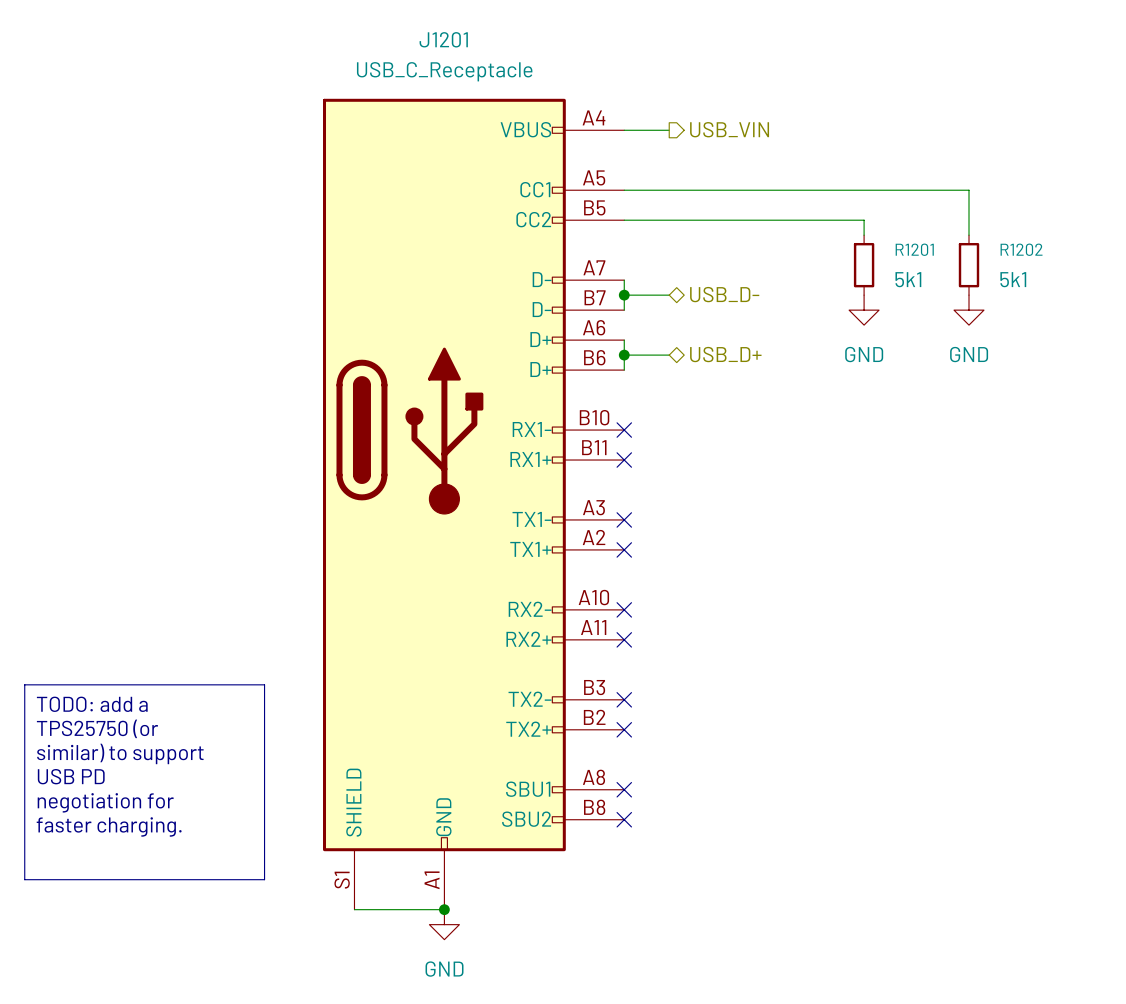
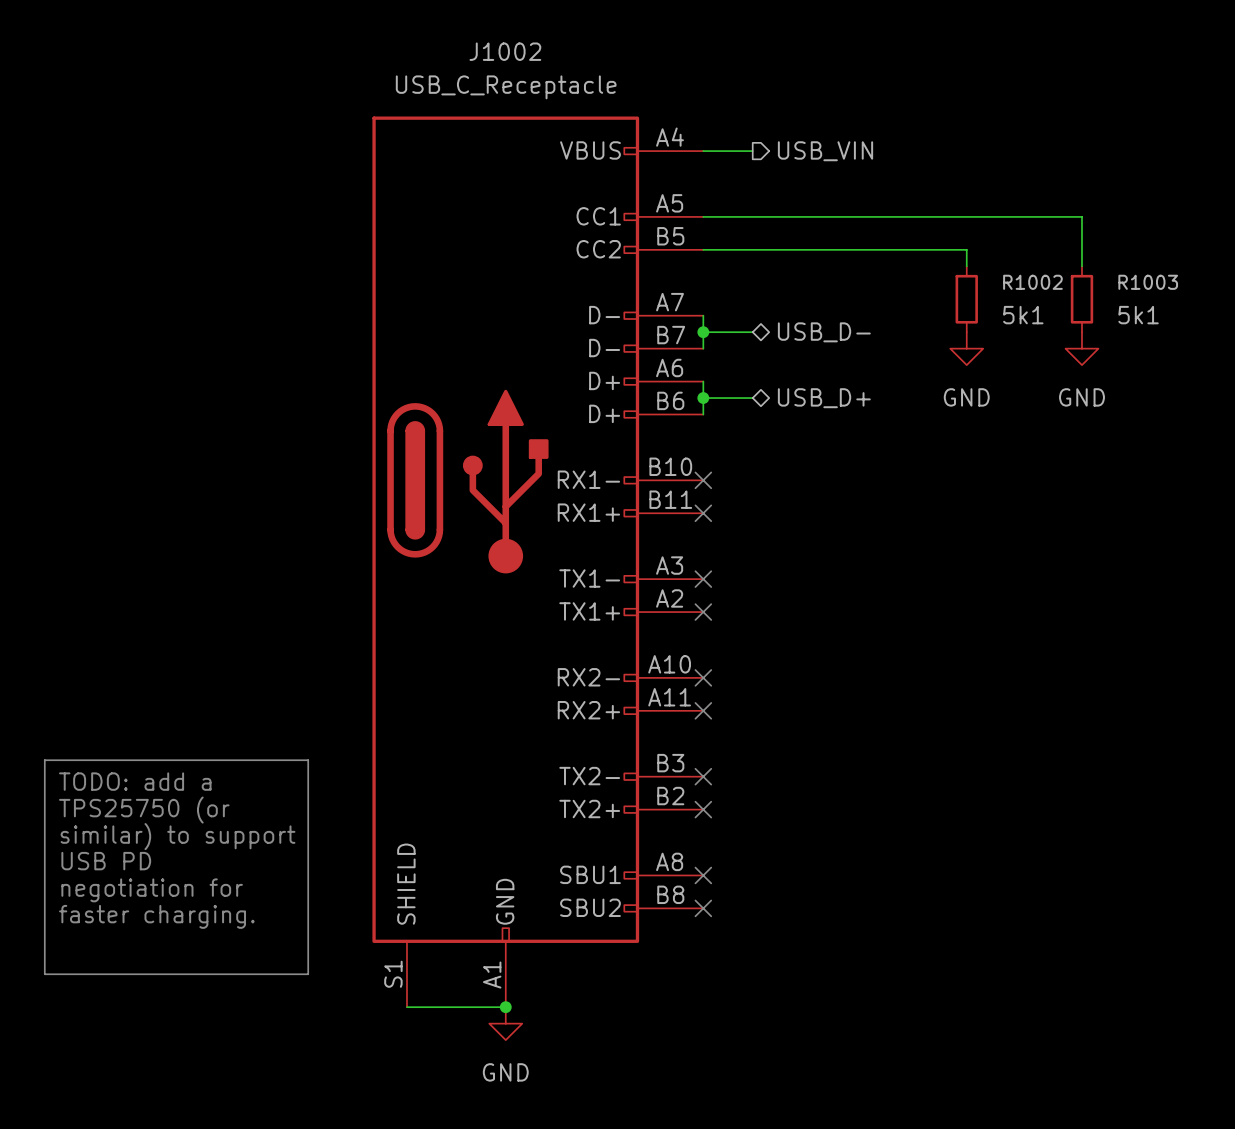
J1201 name: J1201 (443, 39) -> J1002 (505, 51)
R1201 name: R1201 (914, 249) -> R1002 (1032, 282)
R1202 name: R1202 (1021, 249) -> R1003 (1148, 282)

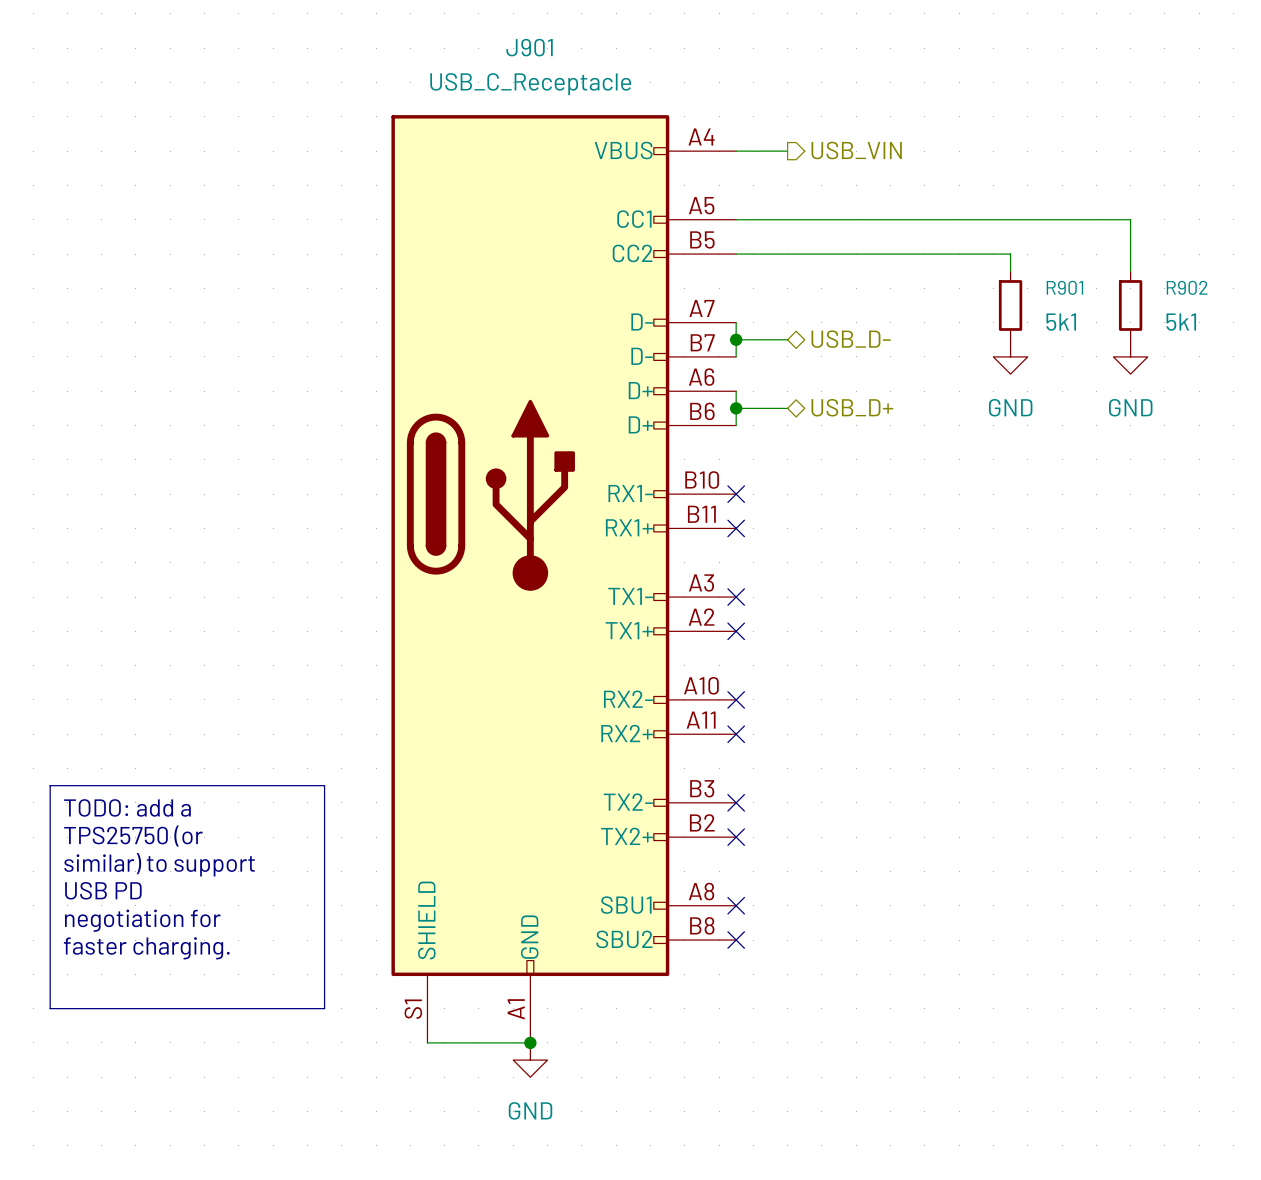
J1002 name: J1002 (505, 51) -> J901 (529, 47)
R1002 name: R1002 (1032, 282) -> R901 (1064, 287)
R1003 name: R1003 (1148, 282) -> R902 (1187, 287)

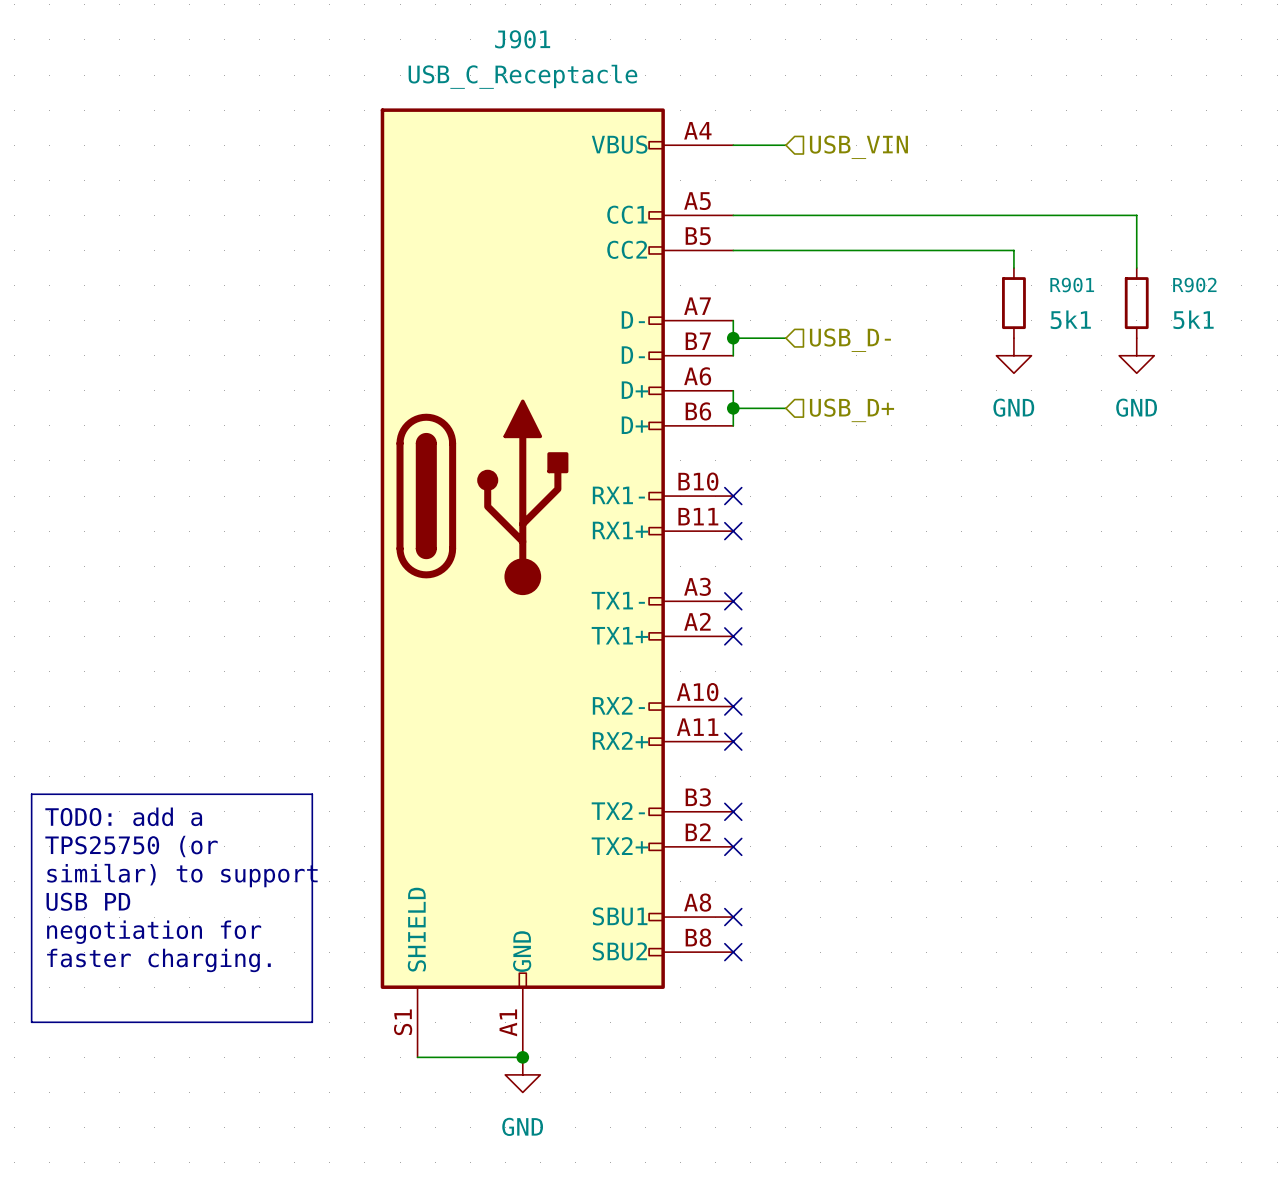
hierarchical label shape: output (856, 150) -> input (858, 147)
hierarchical label shape: bidirectional (851, 339) -> input (850, 340)
hierarchical label shape: bidirectional (852, 407) -> input (851, 410)

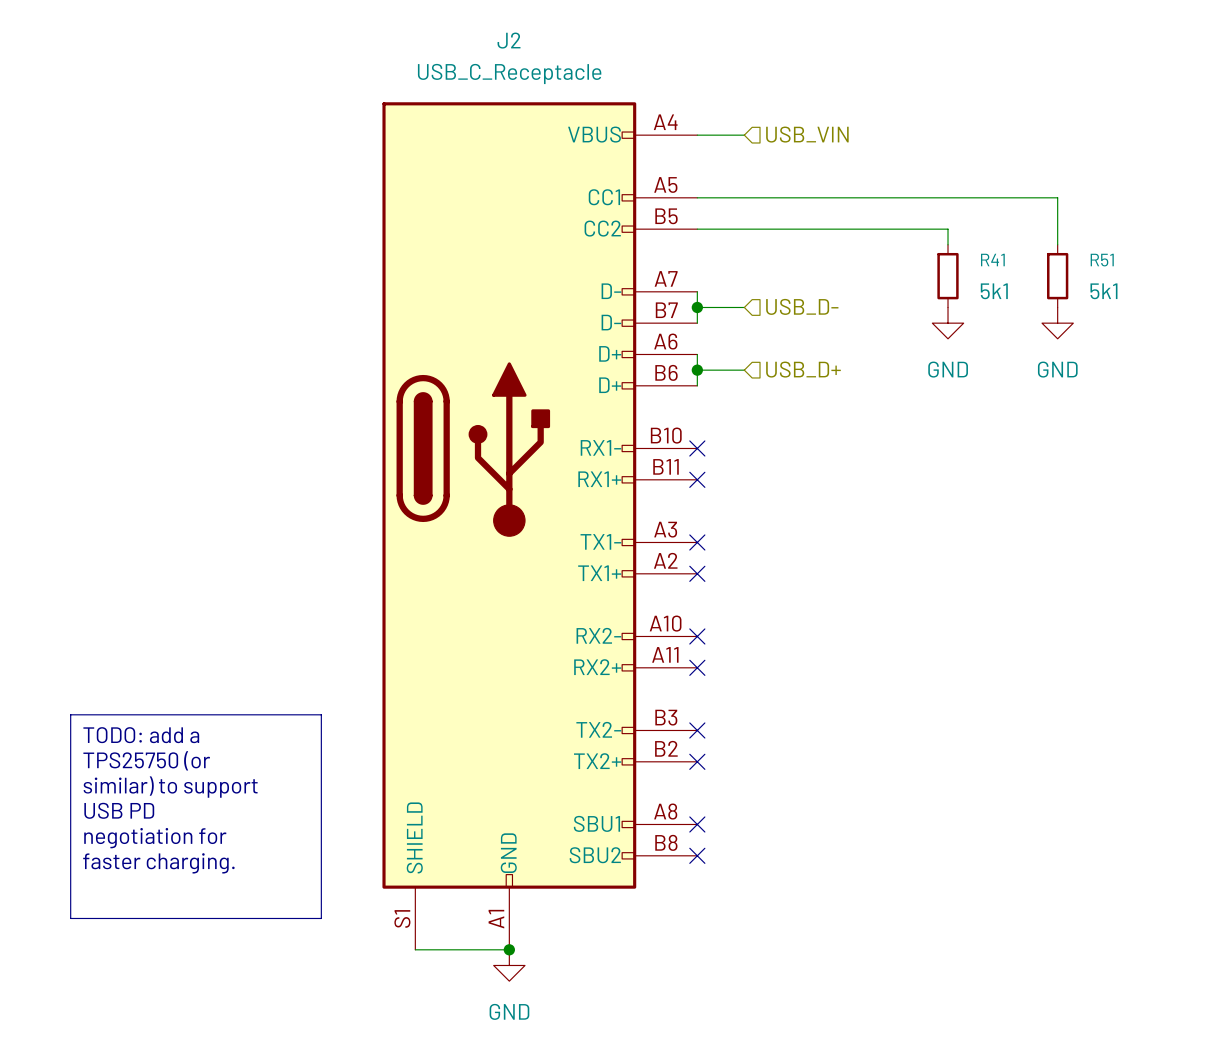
J901 name: J901 (522, 39) -> J2 (509, 40)
R901 name: R901 (1072, 285) -> R41 (992, 260)
R902 name: R902 (1194, 285) -> R51 (1102, 260)

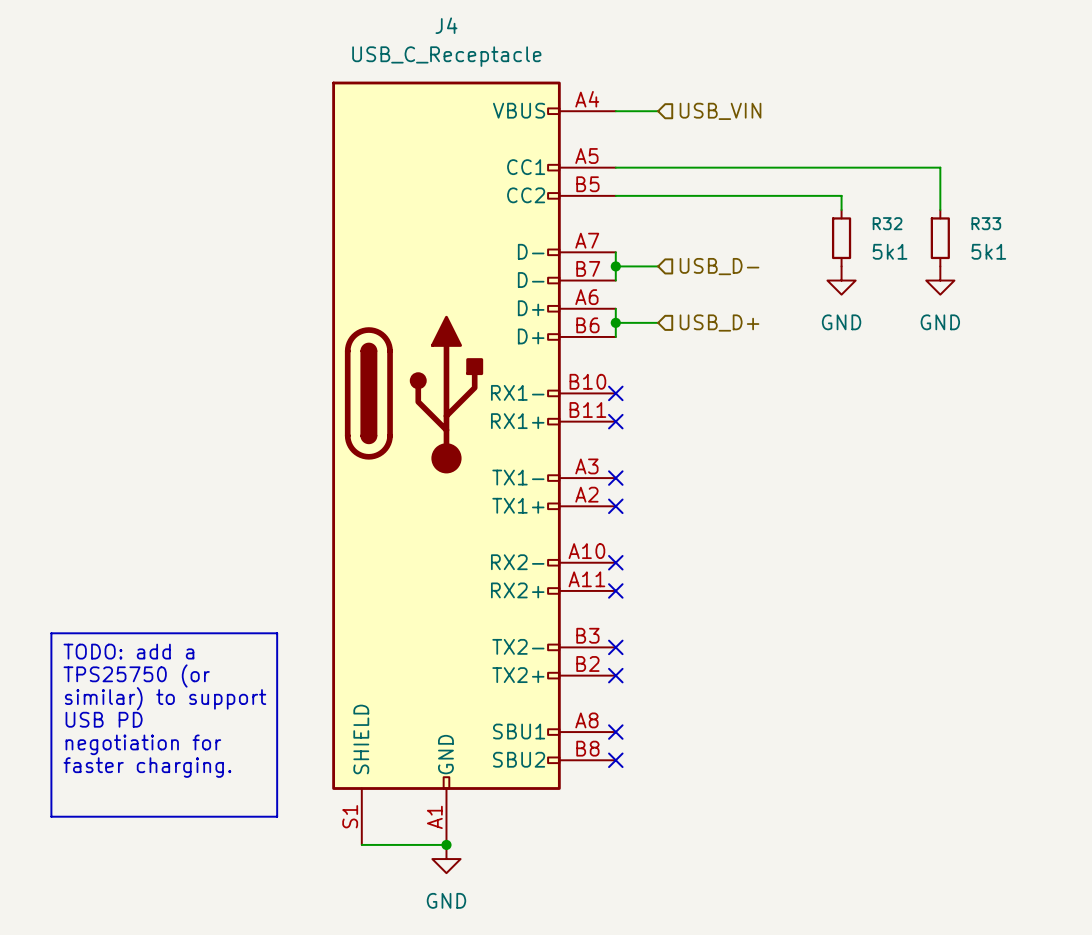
J2 name: J2 (509, 40) -> J4 (446, 25)
R41 name: R41 (992, 260) -> R32 (887, 223)
R51 name: R51 (1102, 260) -> R33 (986, 223)

